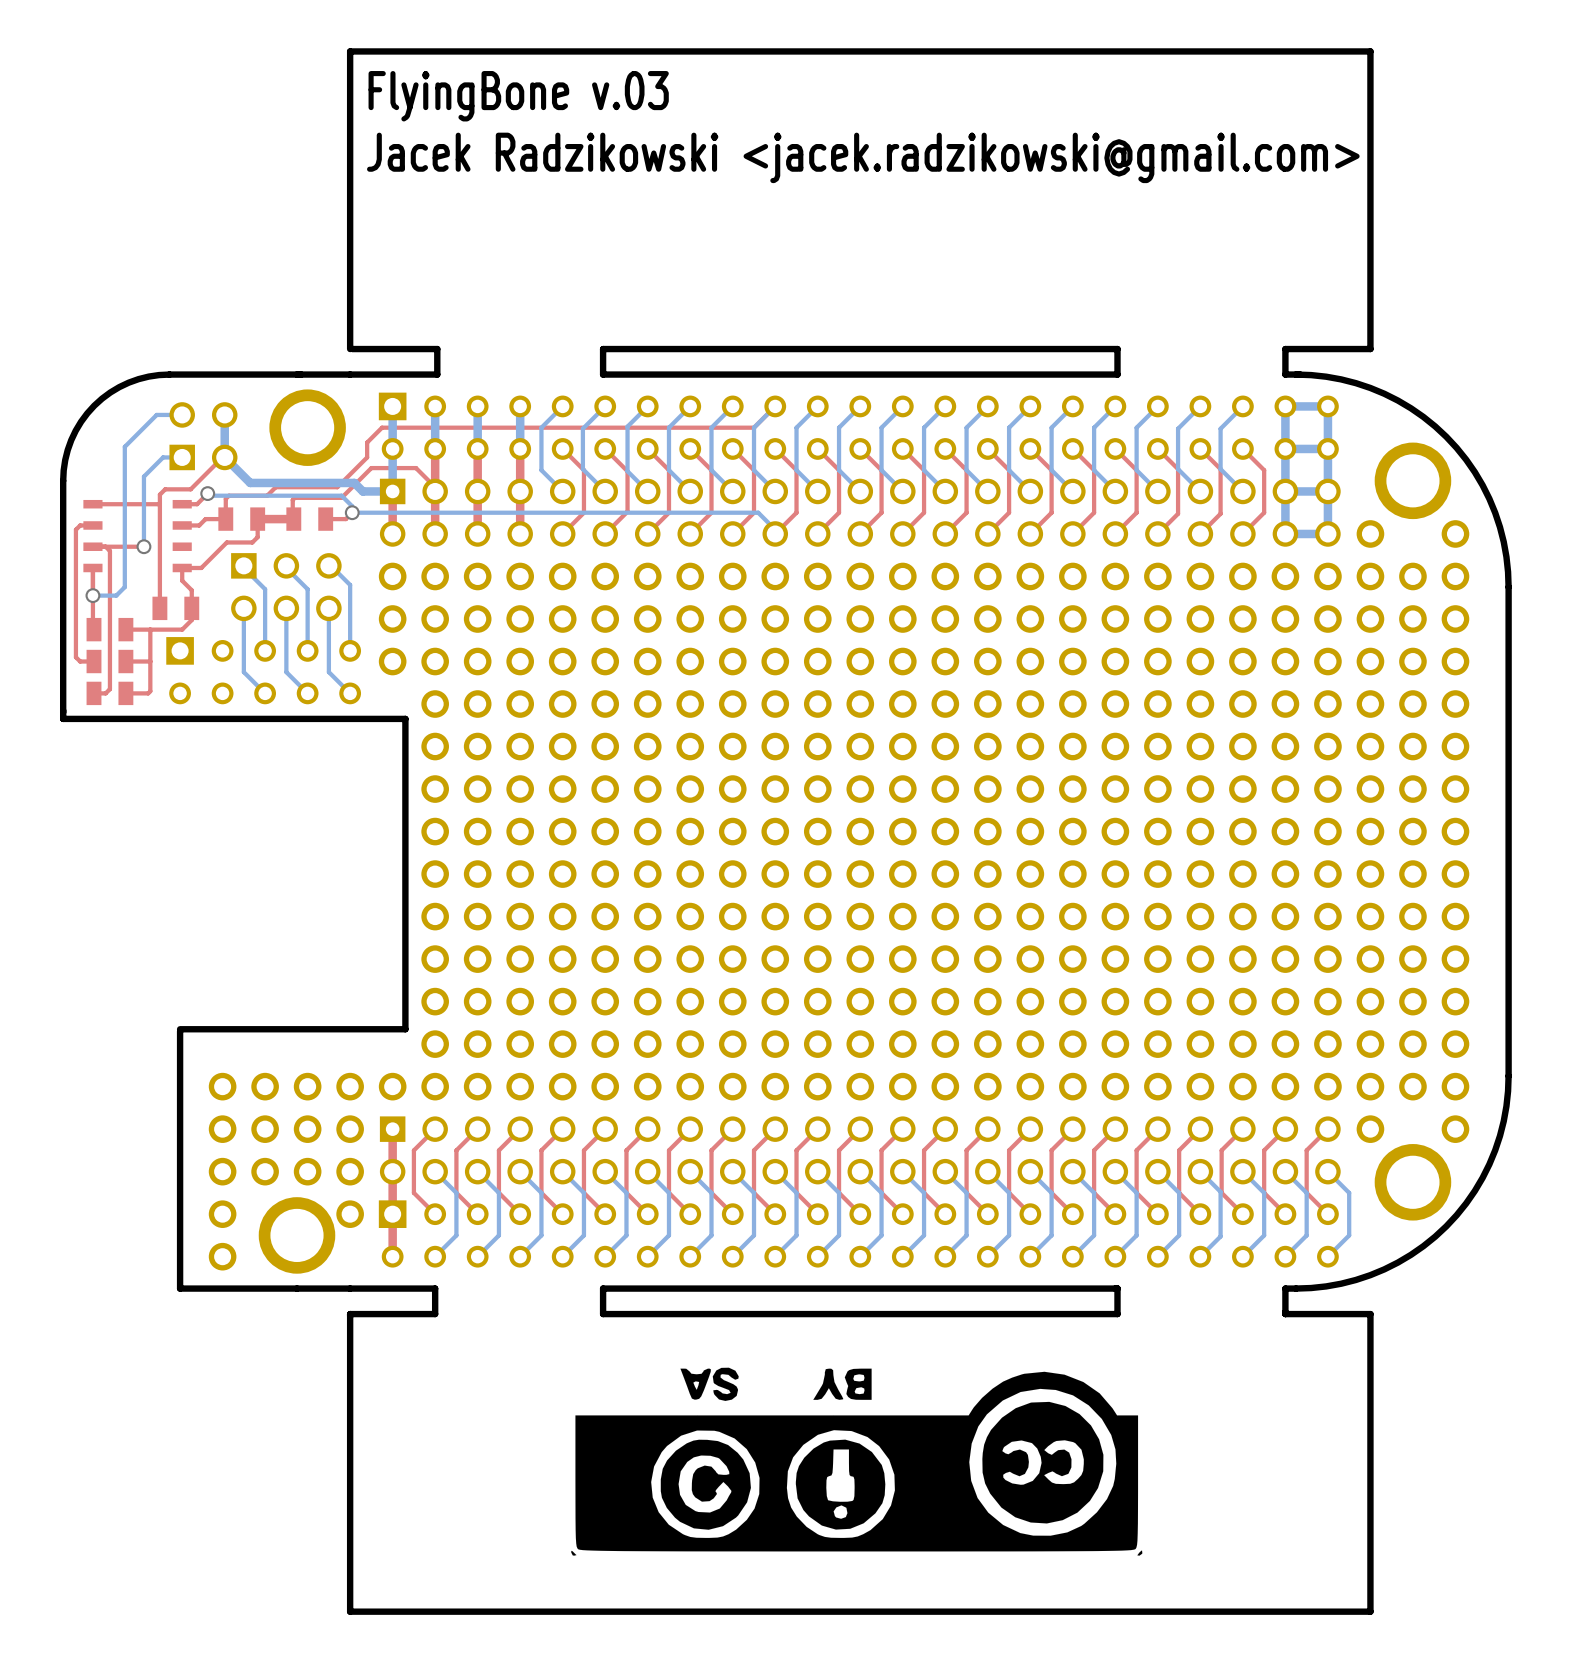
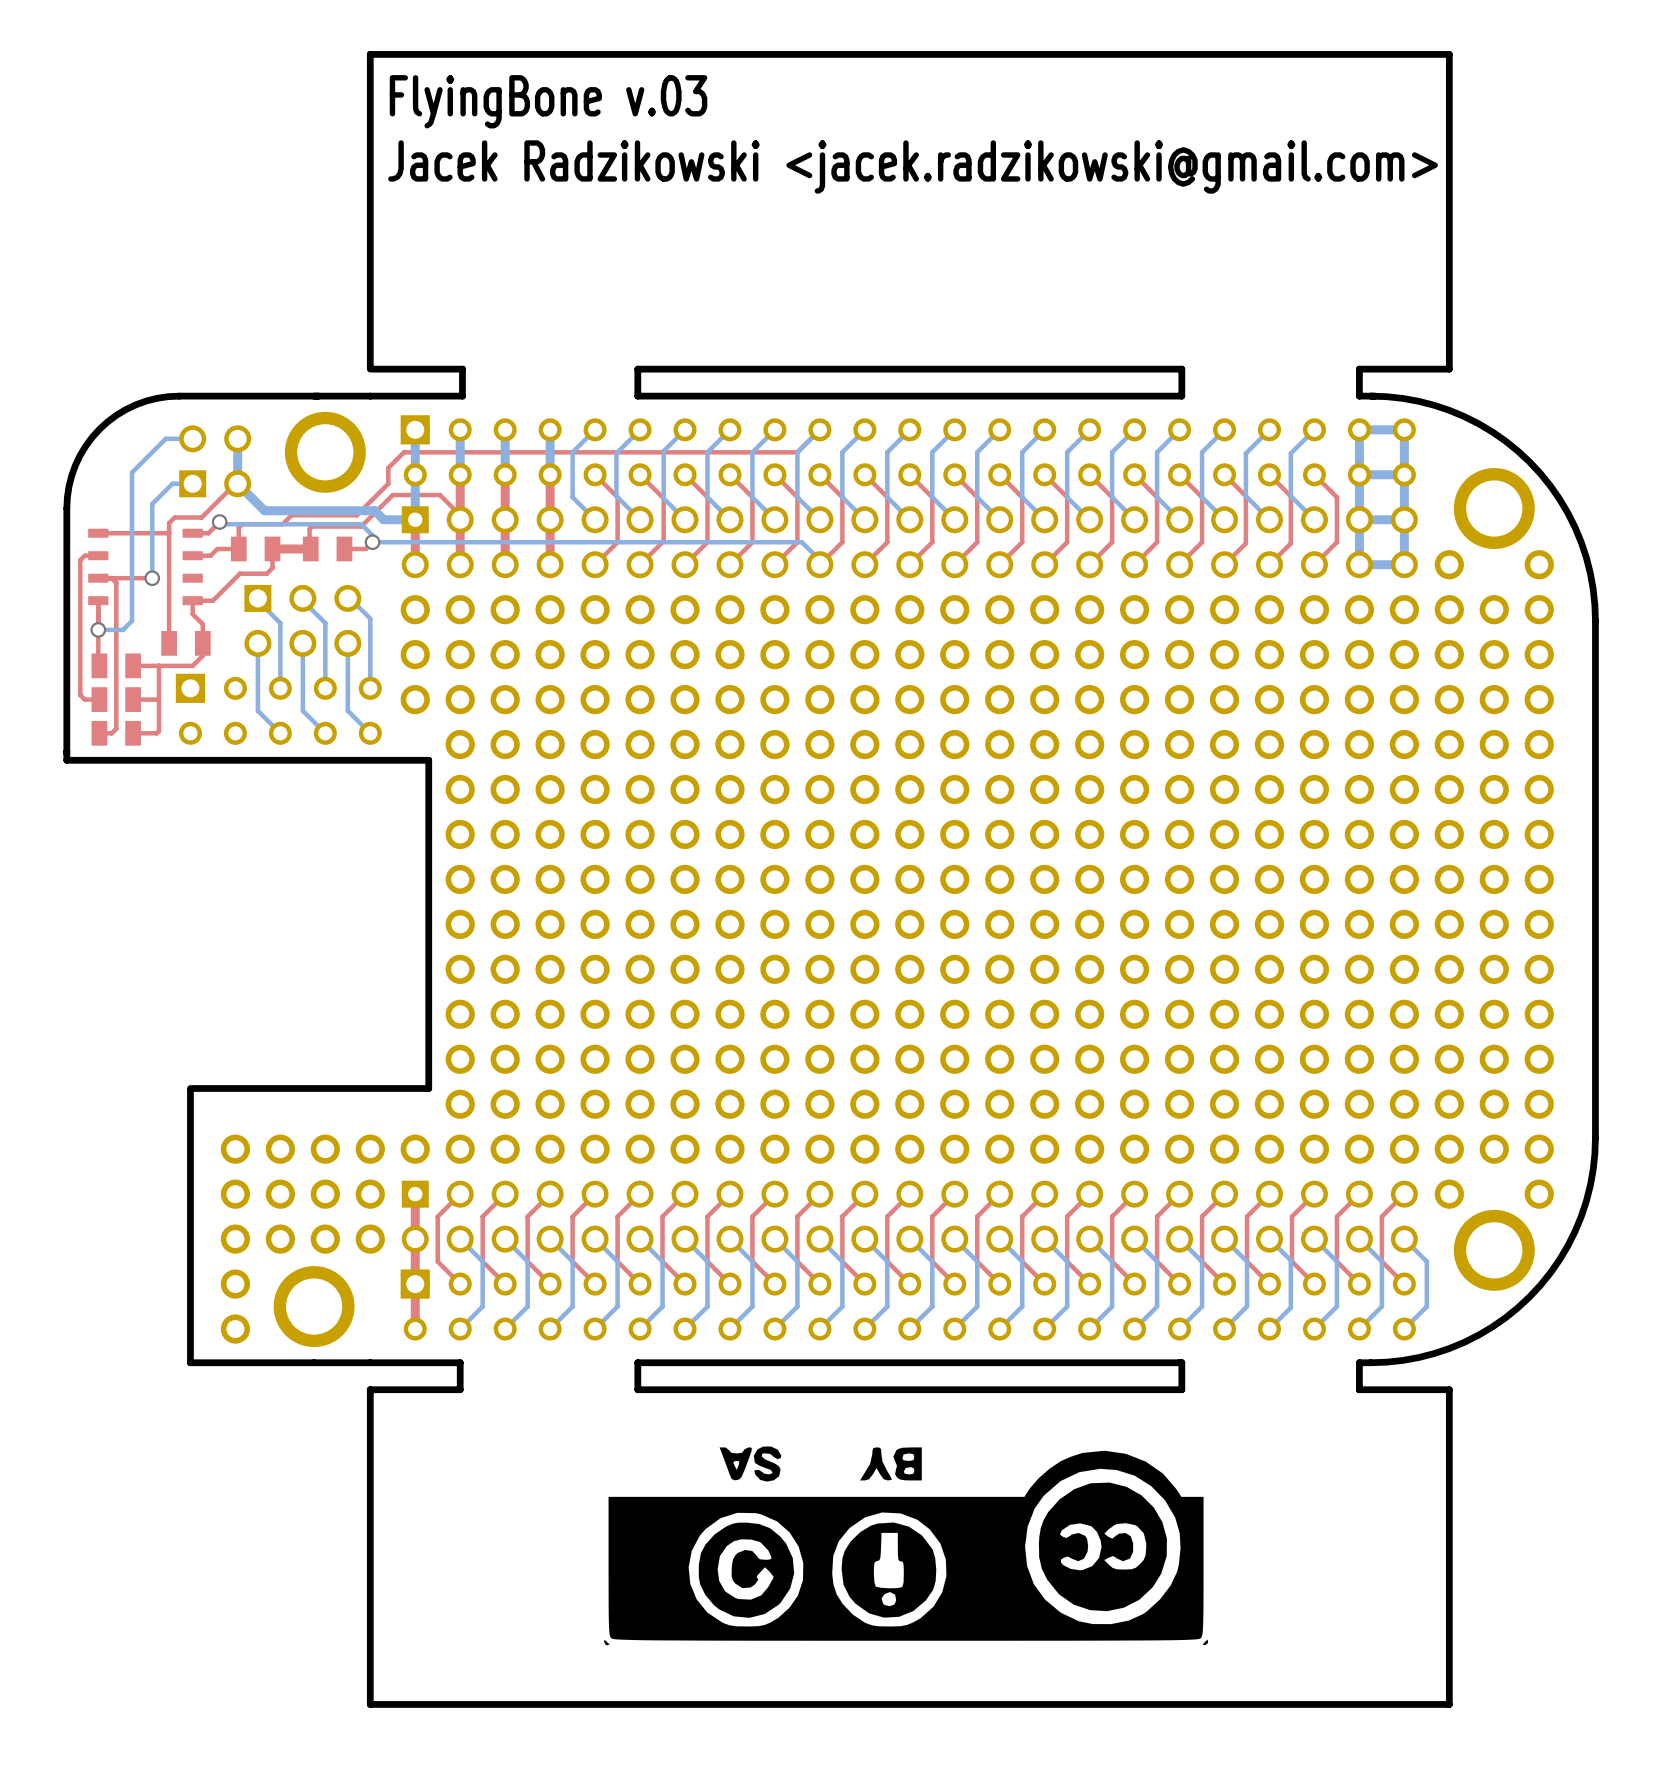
part: (350, 1214) -> none

